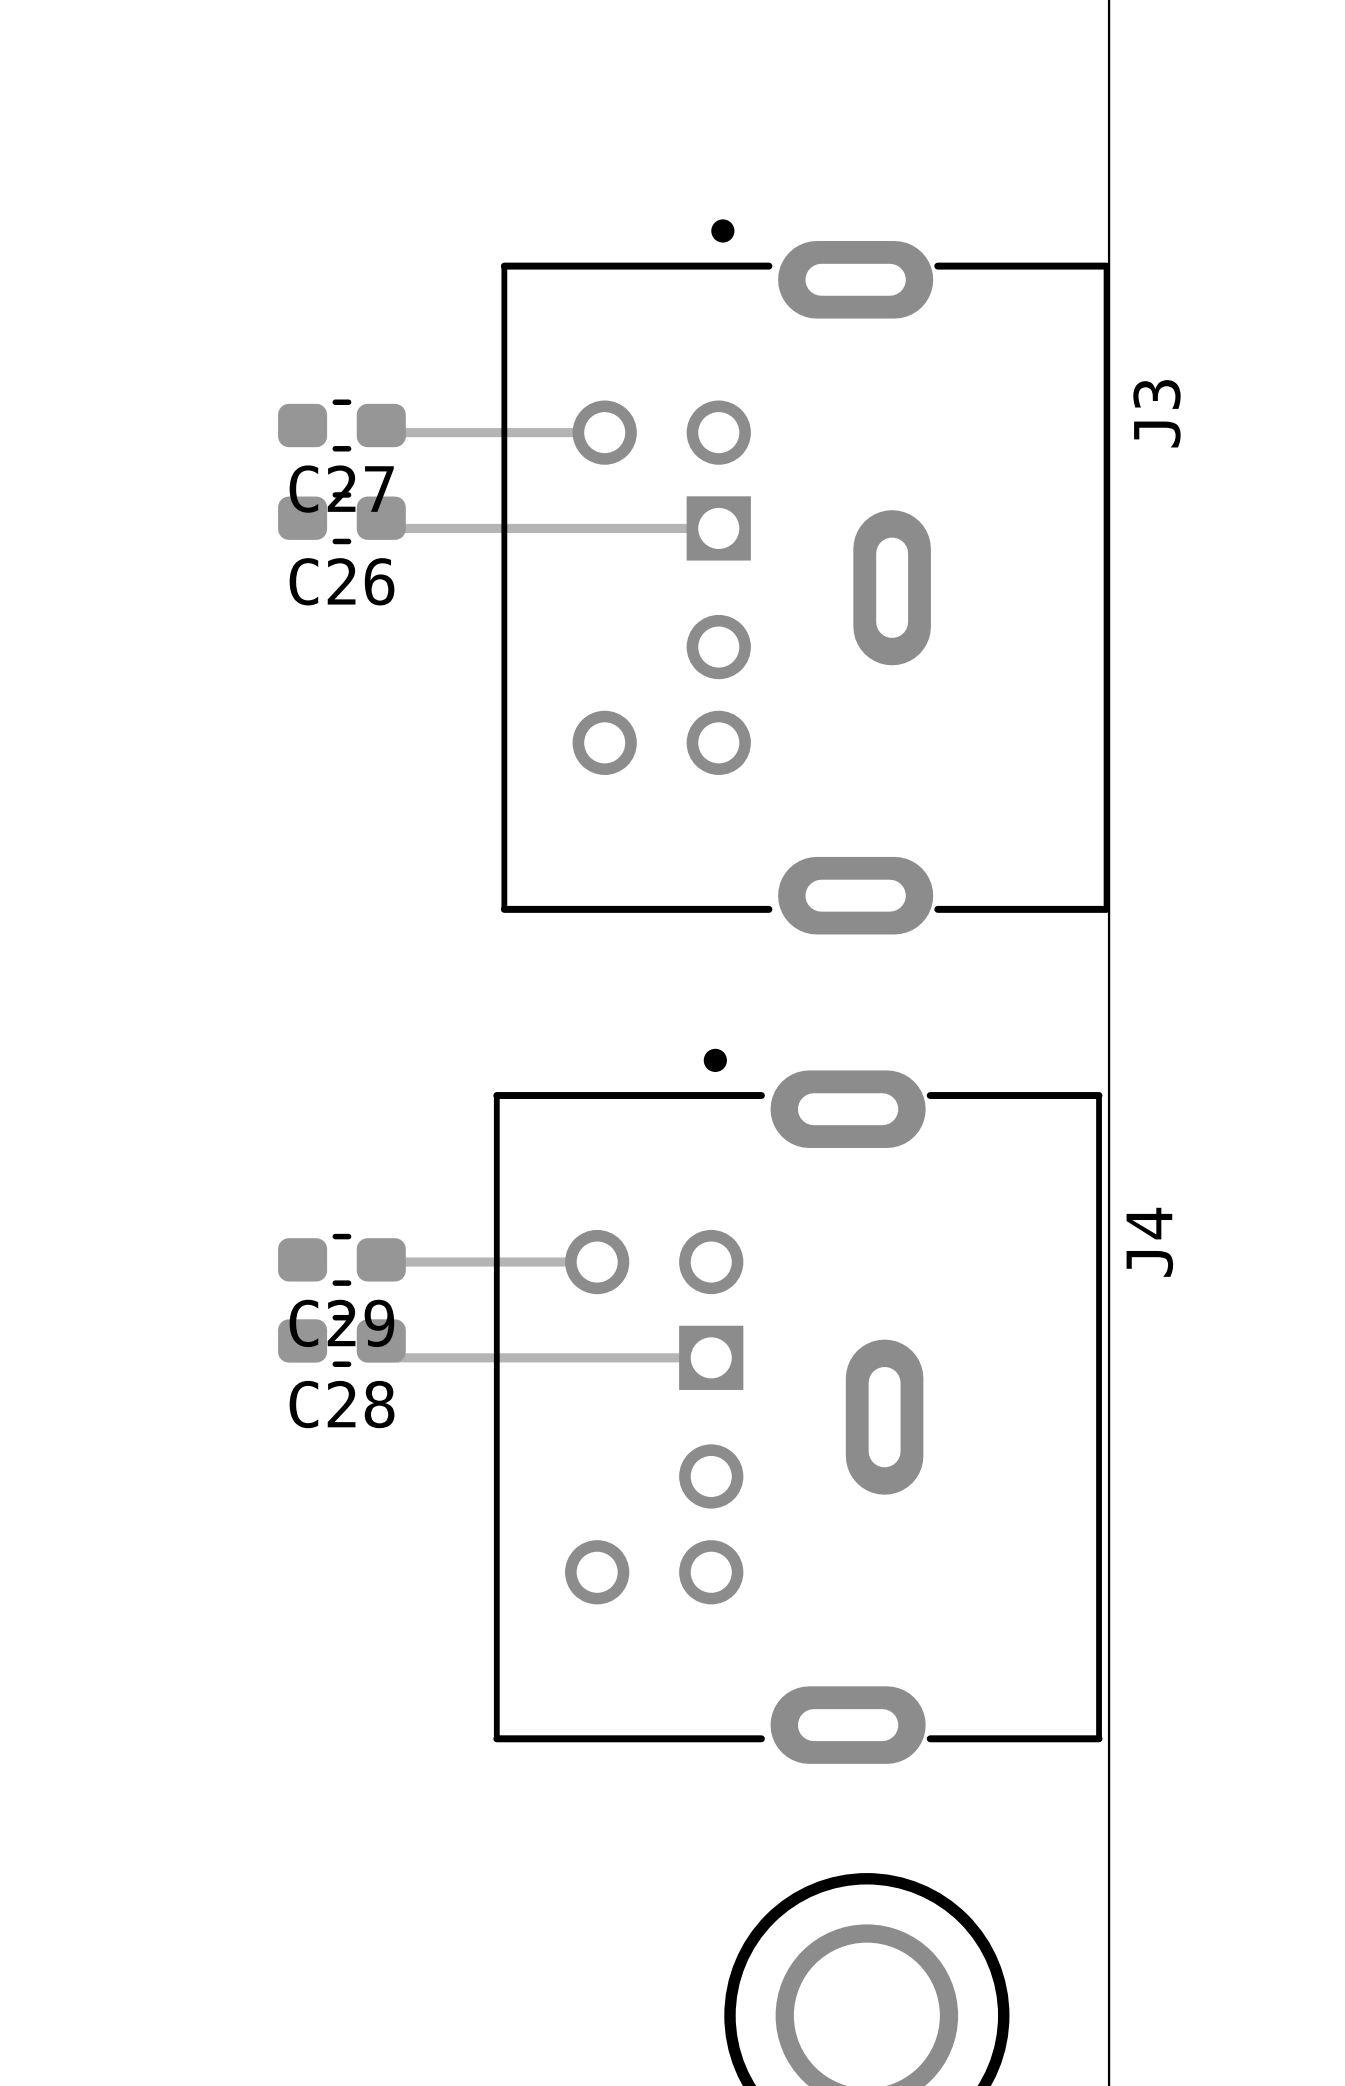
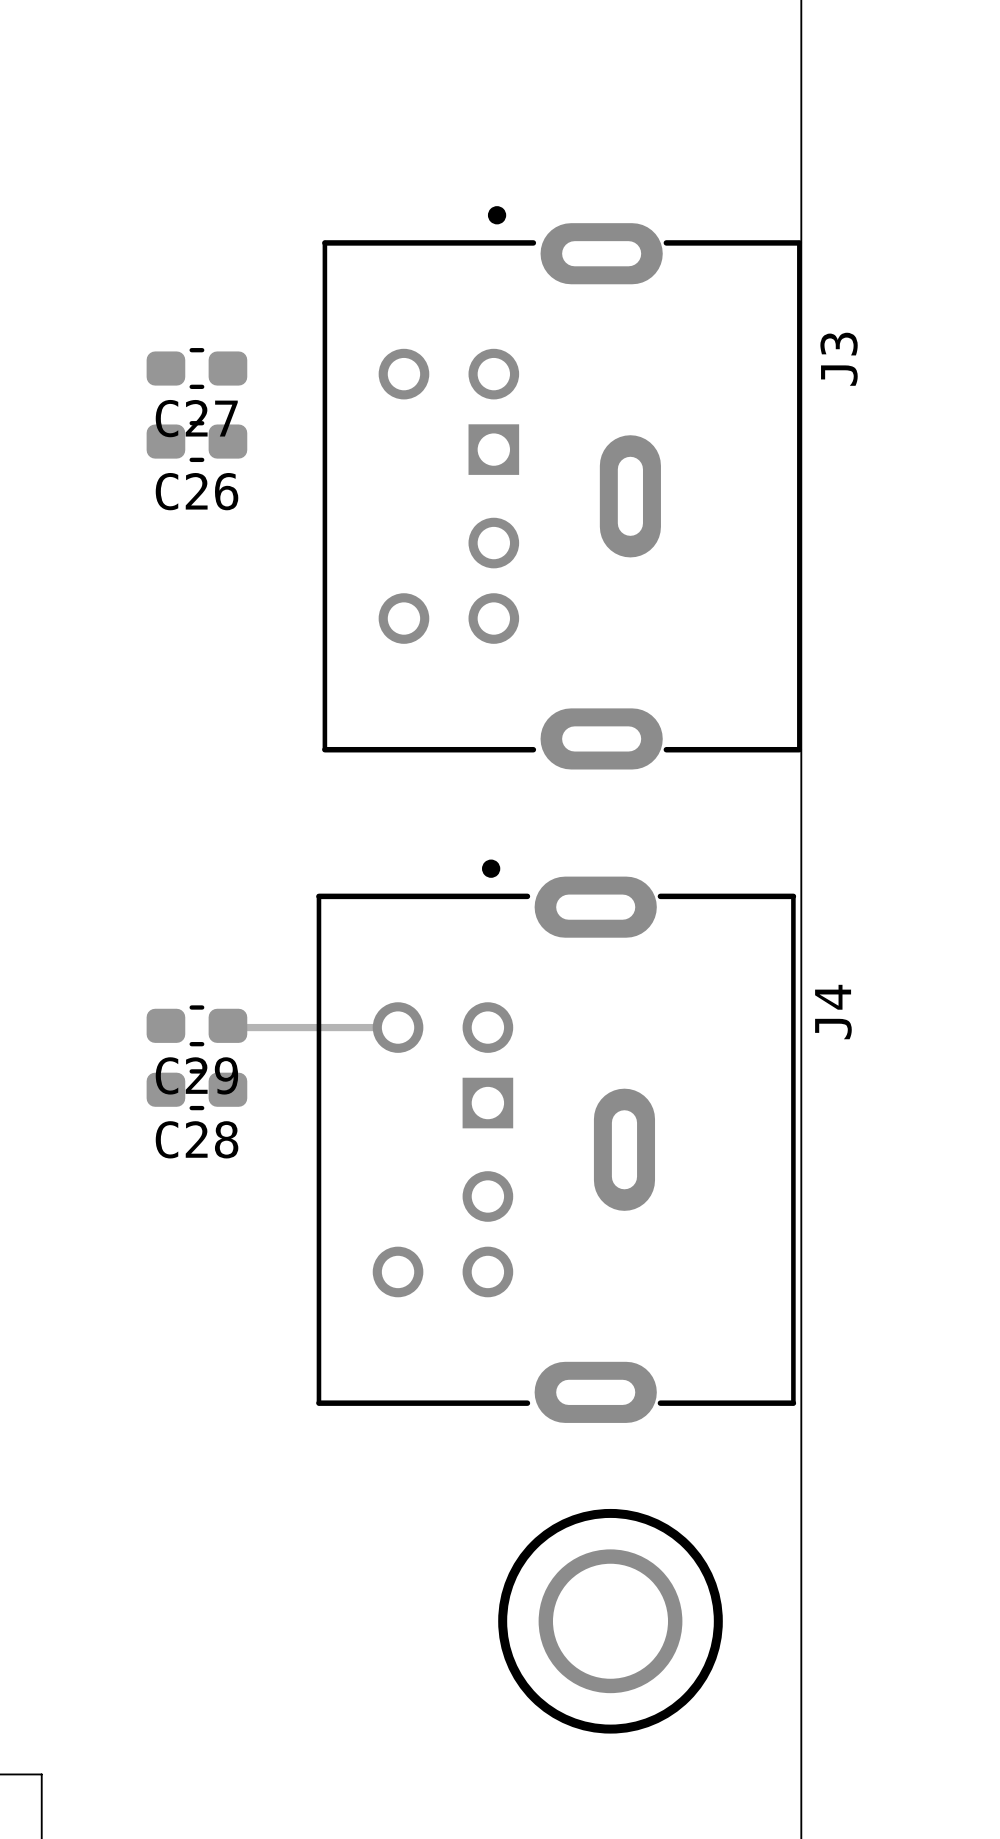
track: (381, 425) (388, 432) (604, 432) -> none
track: (381, 518) (391, 528) (718, 528) -> none
track: (381, 1340) (398, 1357) (711, 1357) -> none

